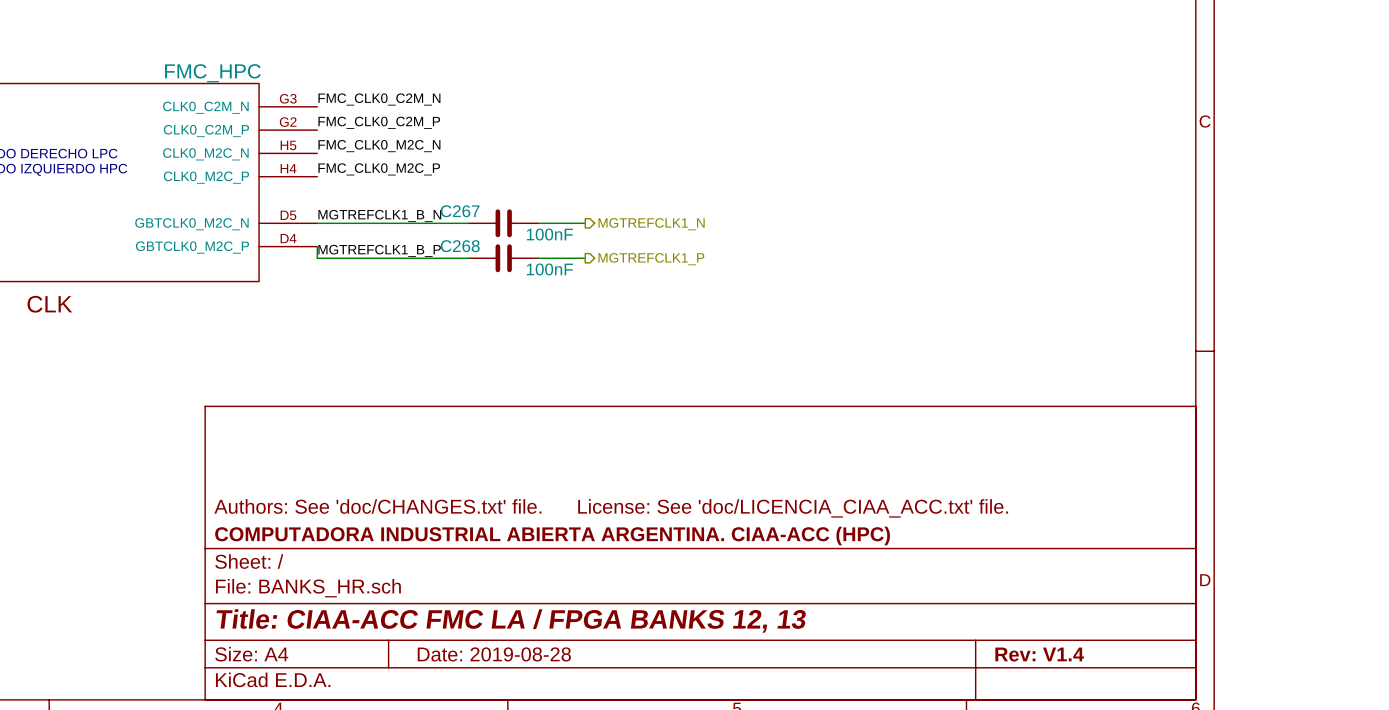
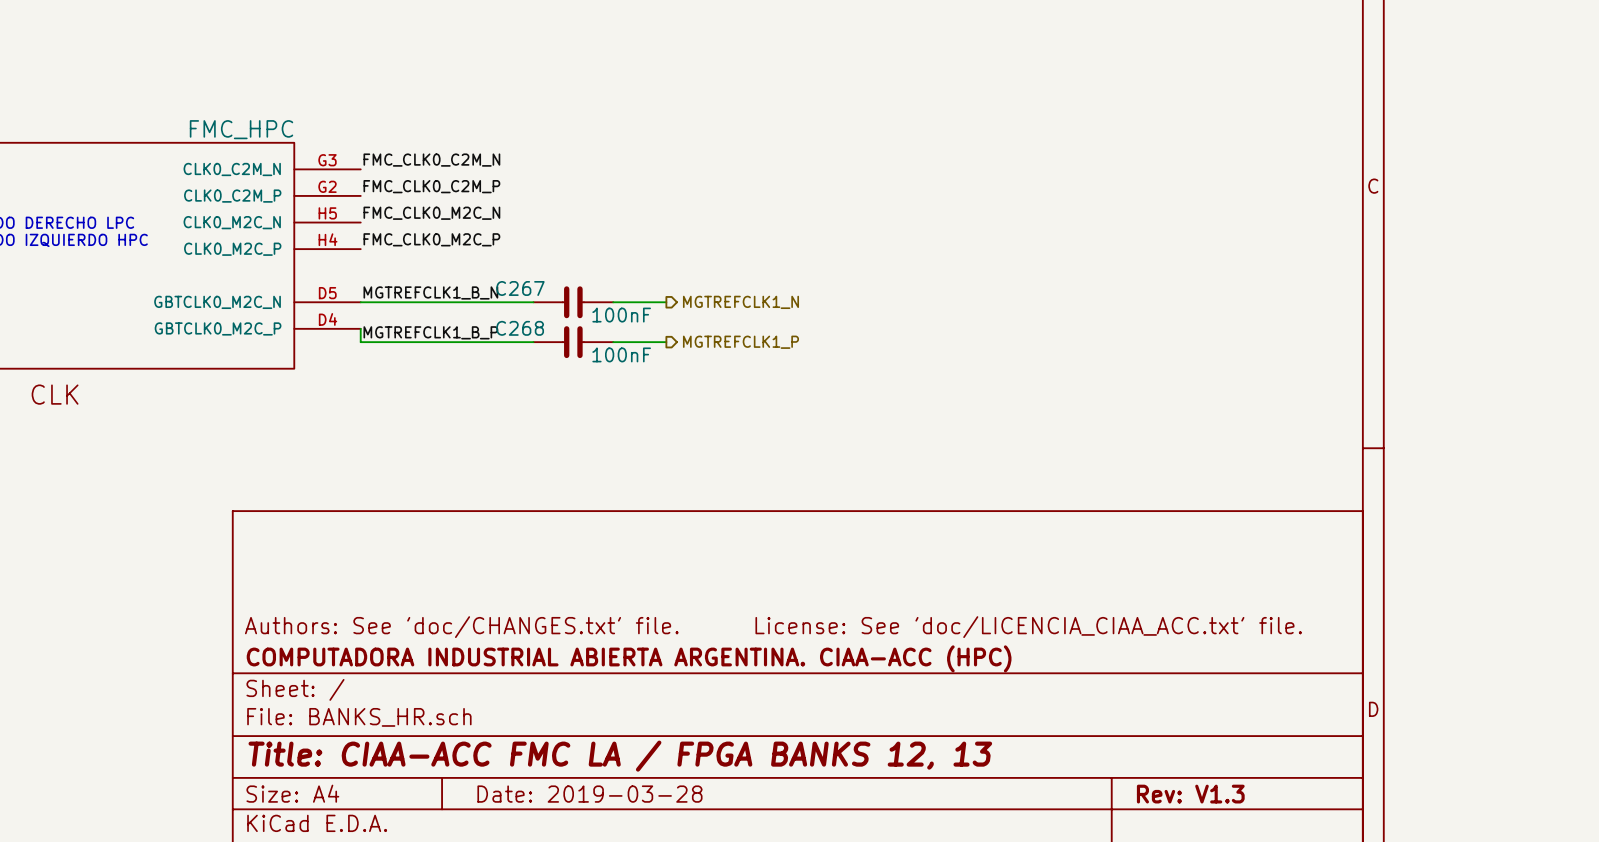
title block: Date: 2019-08-28 (494, 654) -> Date: 2019-03-28 (589, 794)
title block: Rev: V1.4 (1039, 654) -> Rev: V1.3 (1190, 794)

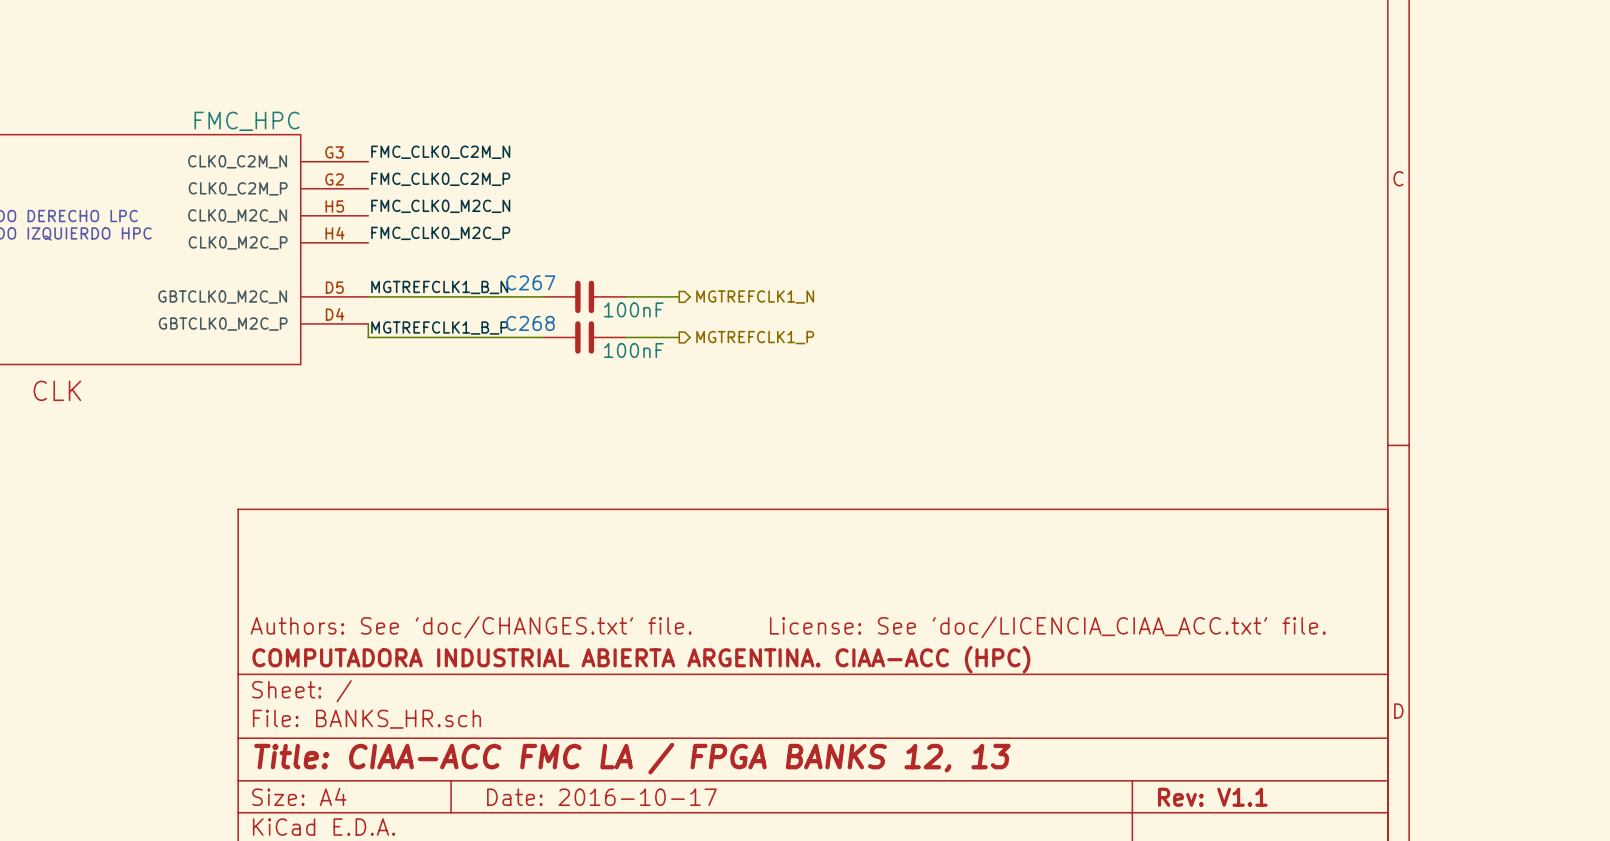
title block: Date: 2019-03-28 (589, 794) -> Date: 2016-10-17 (601, 797)
title block: Rev: V1.3 (1190, 794) -> Rev: V1.1 (1212, 797)

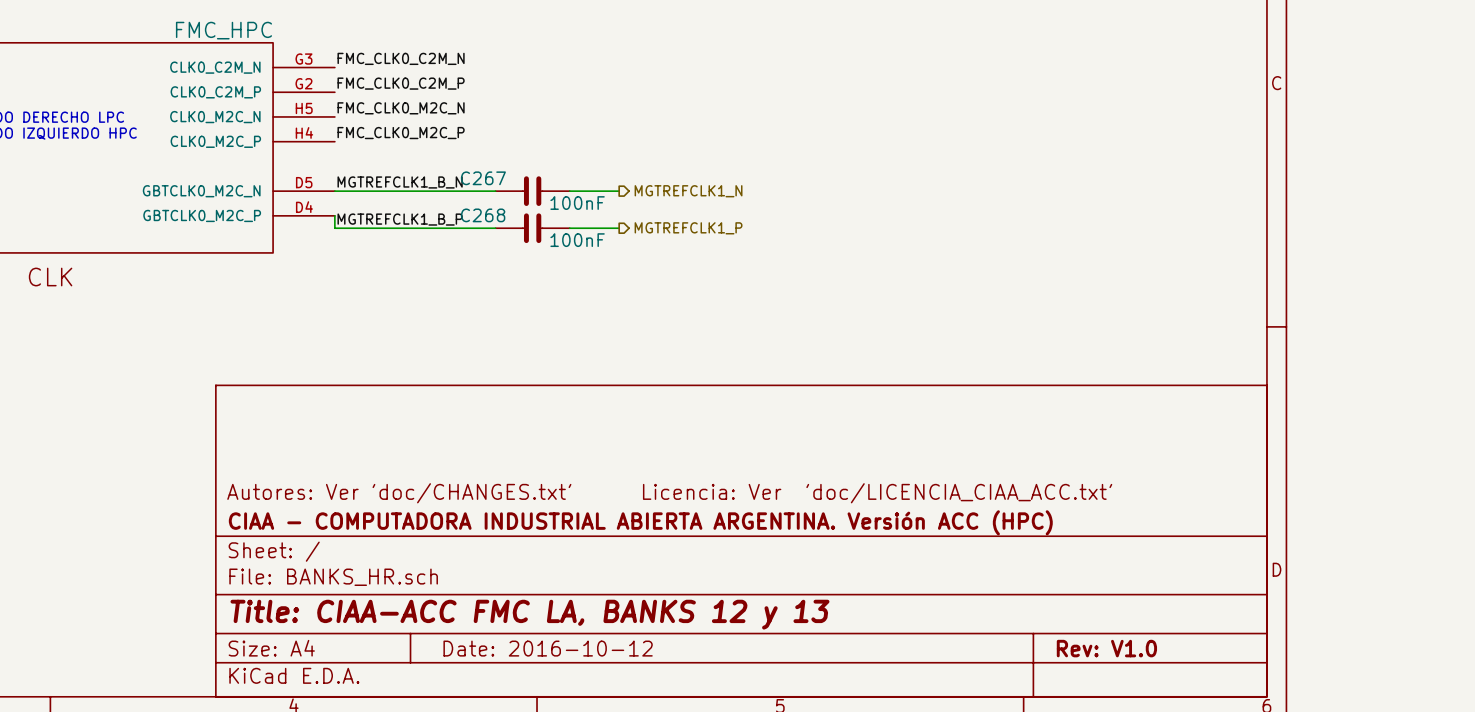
title block: Authors: See 'doc/CHANGES.txt' file. License: See 'doc/LICENCIA_CIAA_ACC.txt' file. (788, 627) -> Autores: Ver 'doc/CHANGES.txt' Licencia: Ver 'doc/LICENCIA_CIAA_ACC.txt' (669, 493)
title block: COMPUTADORA INDUSTRIAL ABIERTA ARGENTINA. CIAA-ACC (HPC) (641, 659) -> CIAA - COMPUTADORA INDUSTRIAL ABIERTA ARGENTINA. Versión ACC (HPC) (640, 522)
title block: Title: CIAA-ACC FMC LA / FPGA BANKS 12, 13 (632, 758) -> Title: CIAA-ACC FMC LA, BANKS 12 y 13 (529, 614)
title block: Date: 2016-10-17 (601, 797) -> Date: 2016-10-12 (548, 648)
title block: Rev: V1.1 (1212, 797) -> Rev: V1.0 (1106, 648)

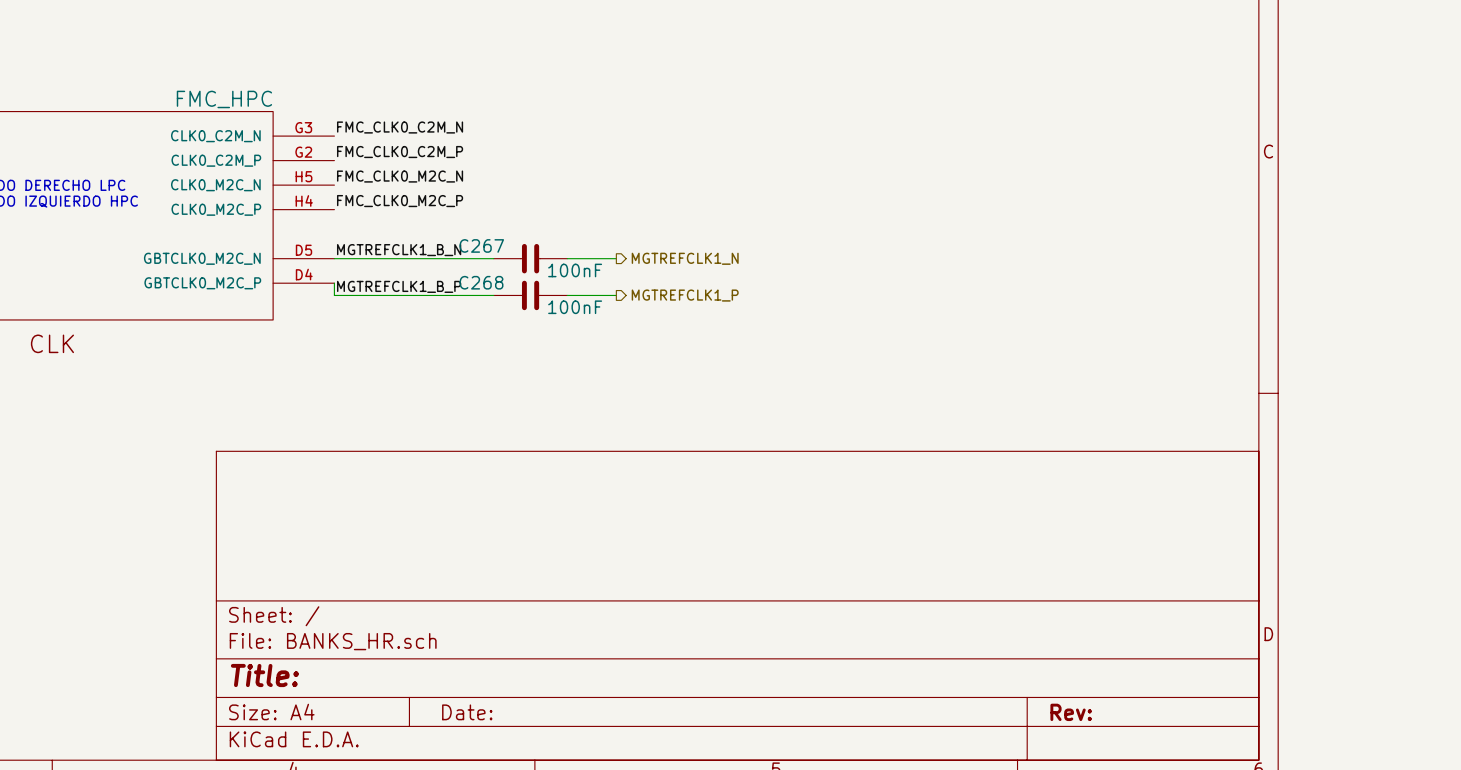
title block: Autores: Ver 'doc/CHANGES.txt' Licencia: Ver 'doc/LICENCIA_CIAA_ACC.txt' (669, 493) -> none
title block: CIAA - COMPUTADORA INDUSTRIAL ABIERTA ARGENTINA. Versión ACC (HPC) (640, 522) -> none
title block: Title: CIAA-ACC FMC LA, BANKS 12 y 13 (529, 614) -> Title: (264, 675)
title block: Date: 2016-10-12 (548, 648) -> Date: (467, 712)
title block: Rev: V1.0 (1106, 648) -> Rev: (1071, 712)

